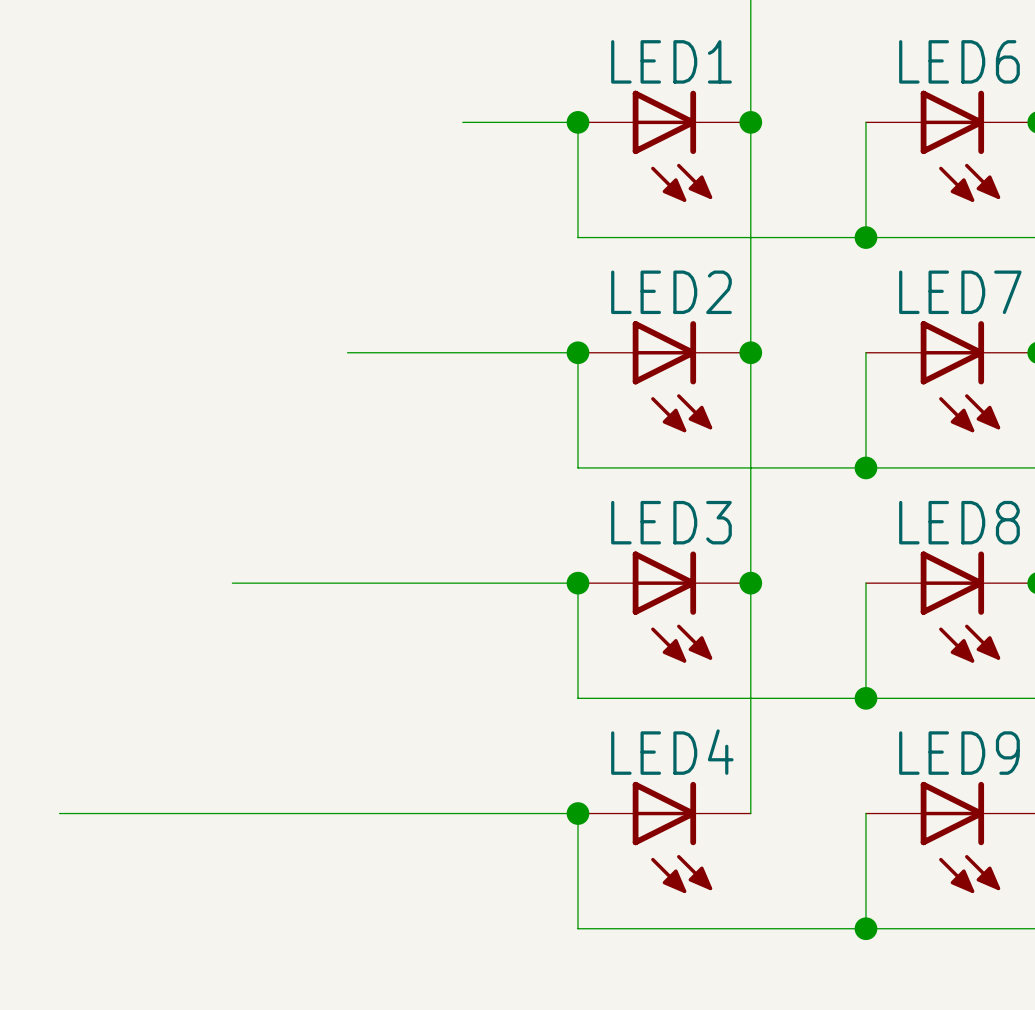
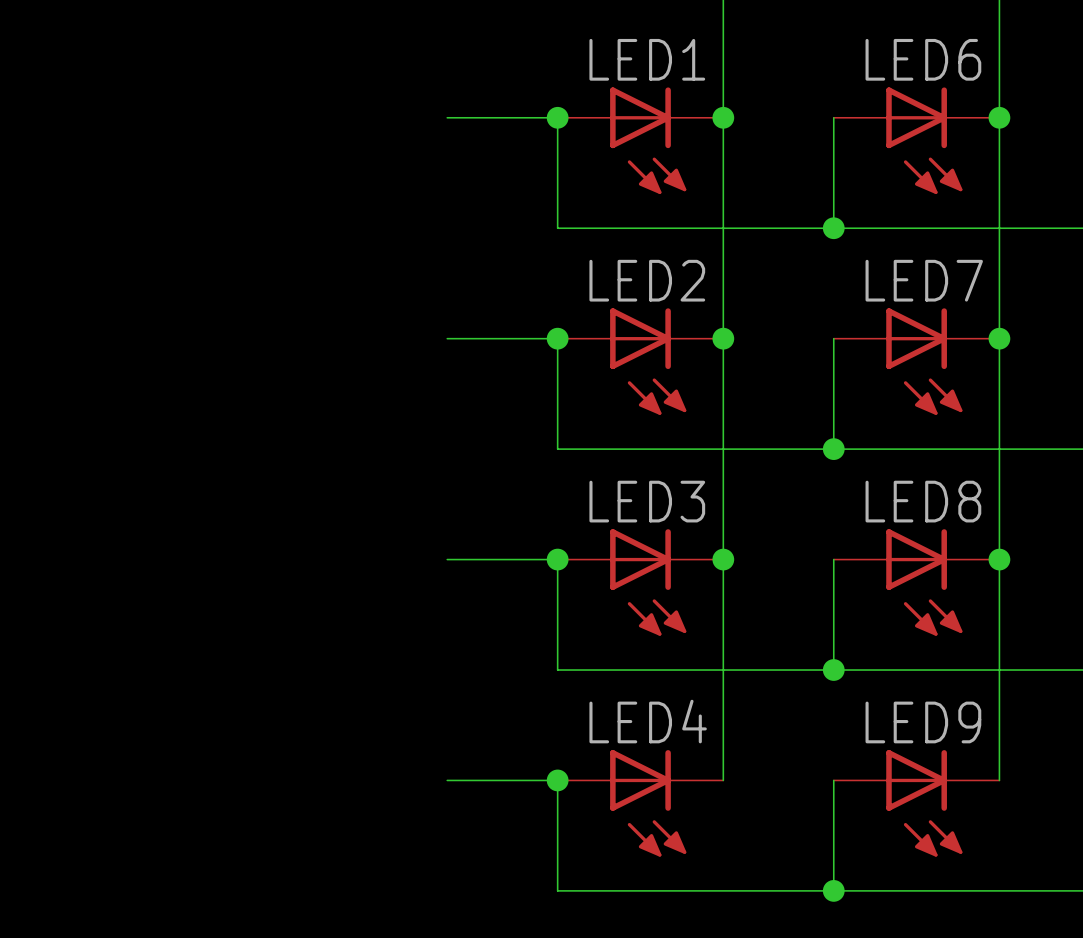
wire: (347, 352) (462, 352) -> none
wire: (232, 583) (462, 583) -> none
wire: (59, 813) (462, 813) -> none

